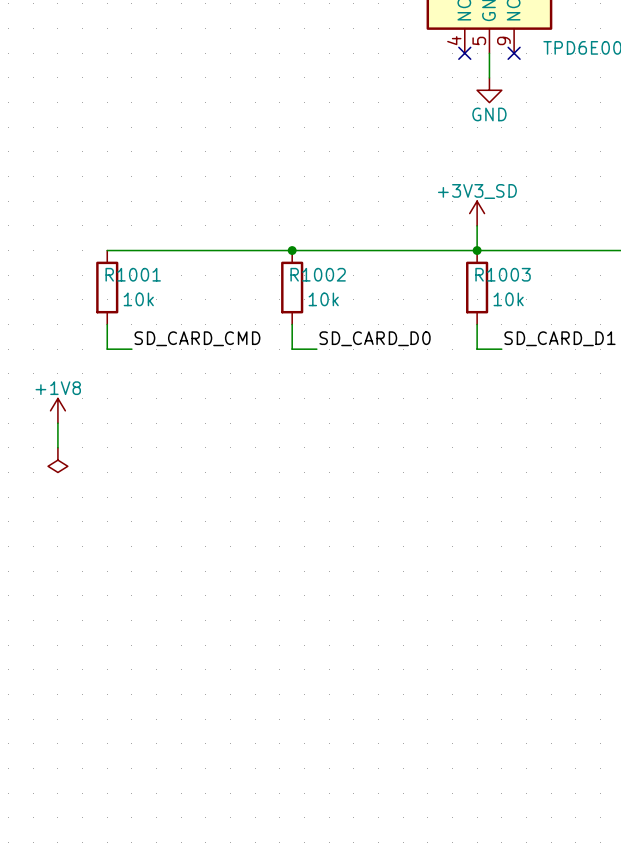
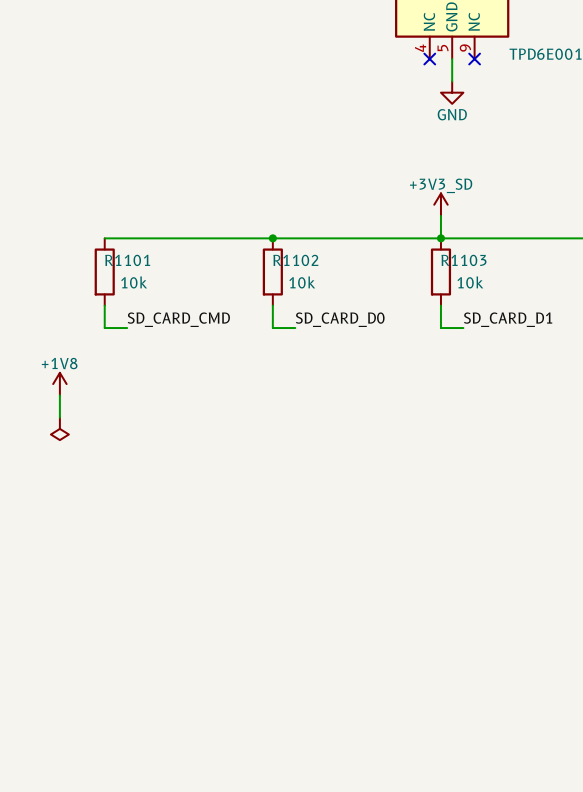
R1001 name: R1001 (133, 274) -> R1101 (127, 260)
R1002 name: R1002 (318, 274) -> R1102 (295, 260)
R1003 name: R1003 (503, 274) -> R1103 (463, 260)

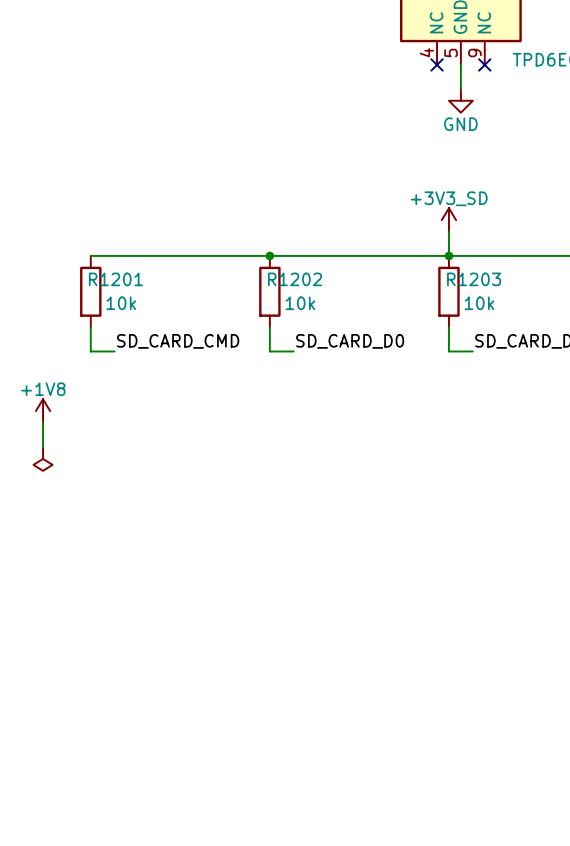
R1101 name: R1101 (127, 260) -> R1201 (115, 279)
R1102 name: R1102 (295, 260) -> R1202 (295, 279)
R1103 name: R1103 (463, 260) -> R1203 (474, 279)

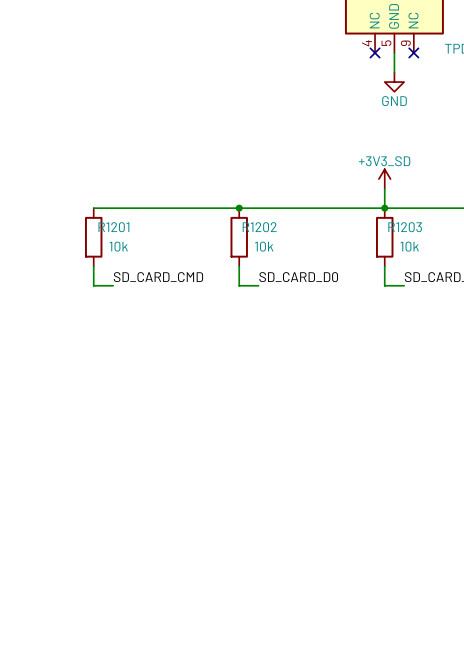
power symbol: +1V8 (43, 411) -> none
wire: (43, 423) (43, 446) -> none
power symbol: (43, 458) -> none

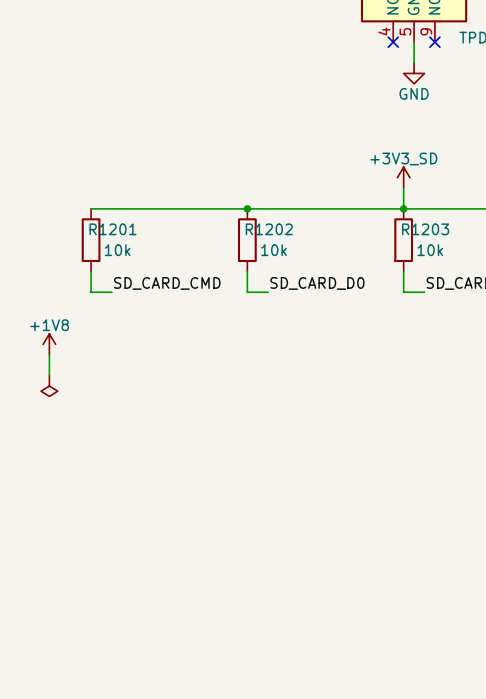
power symbol: none -> +1V8 (49, 344)
wire: none -> (49, 354) (49, 375)
power symbol: none -> (49, 386)

